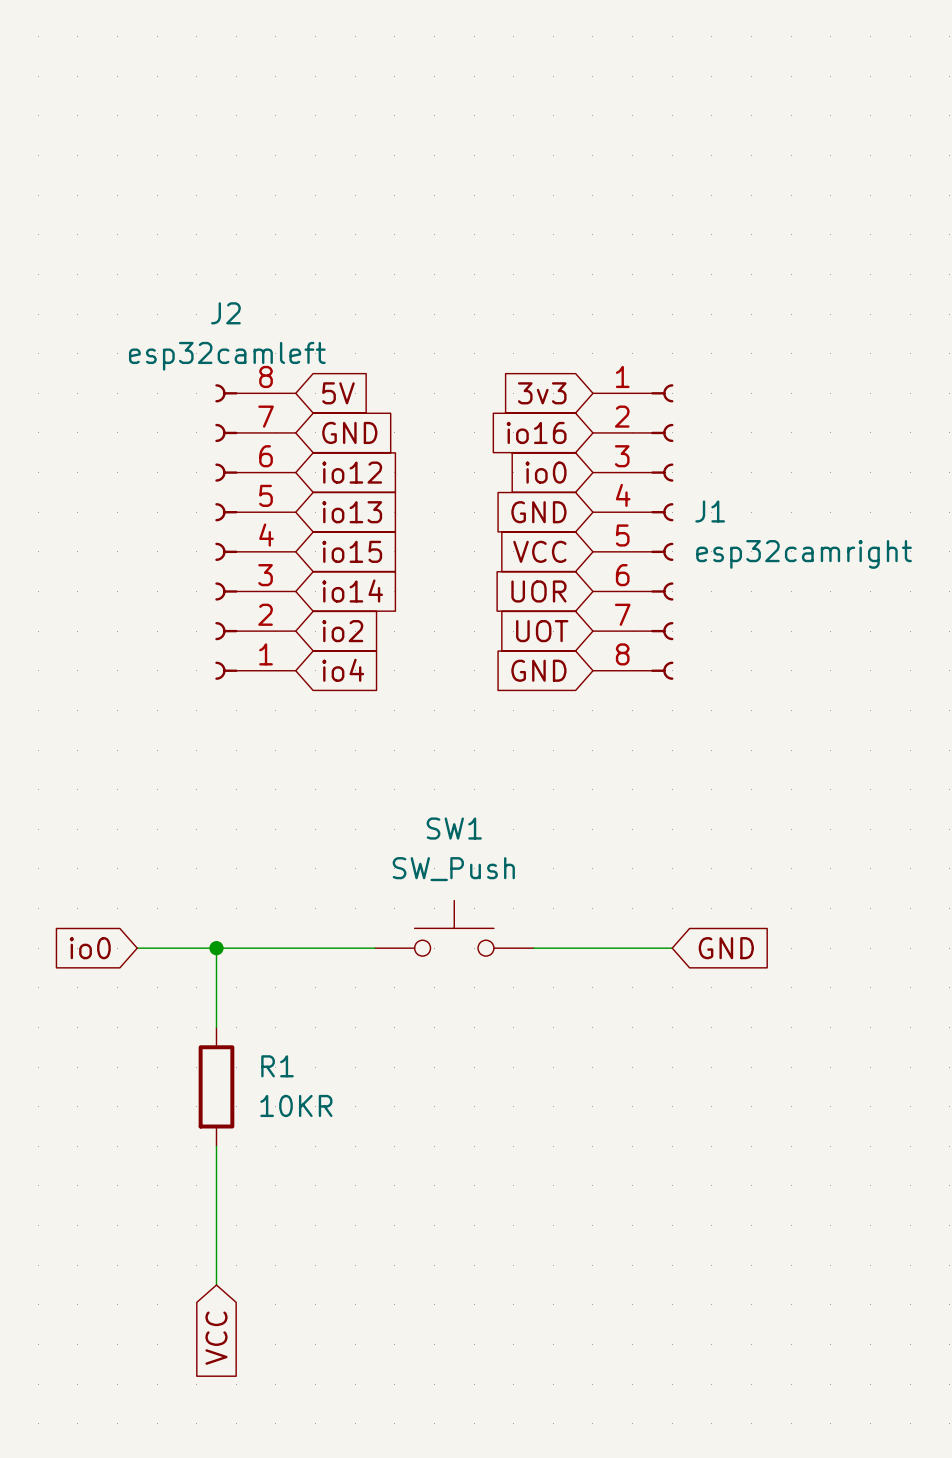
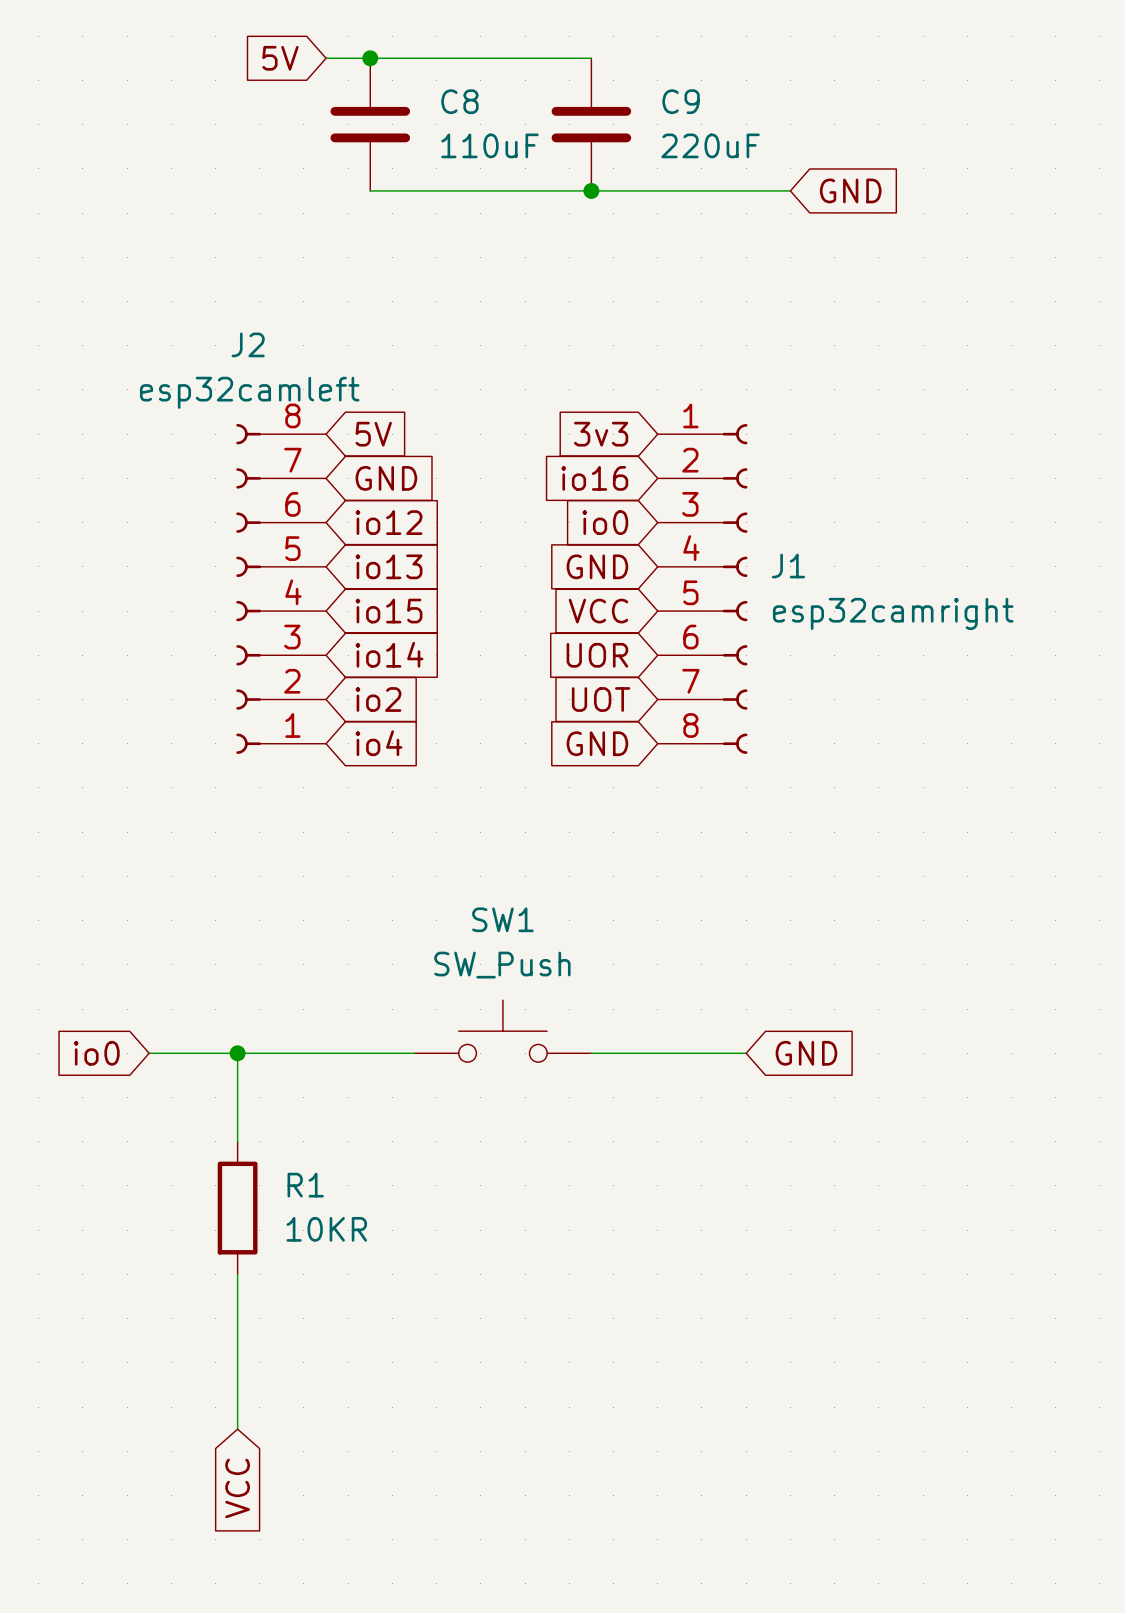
global label: none -> 5V (280, 58)
wire: none -> (326, 58) (591, 58)
junction: none -> (370, 58)
C8: none -> 110uF (370, 124)
C9: none -> 220uF (591, 124)
wire: none -> (370, 190) (790, 190)
junction: none -> (591, 190)
global label: none -> GND (850, 190)

